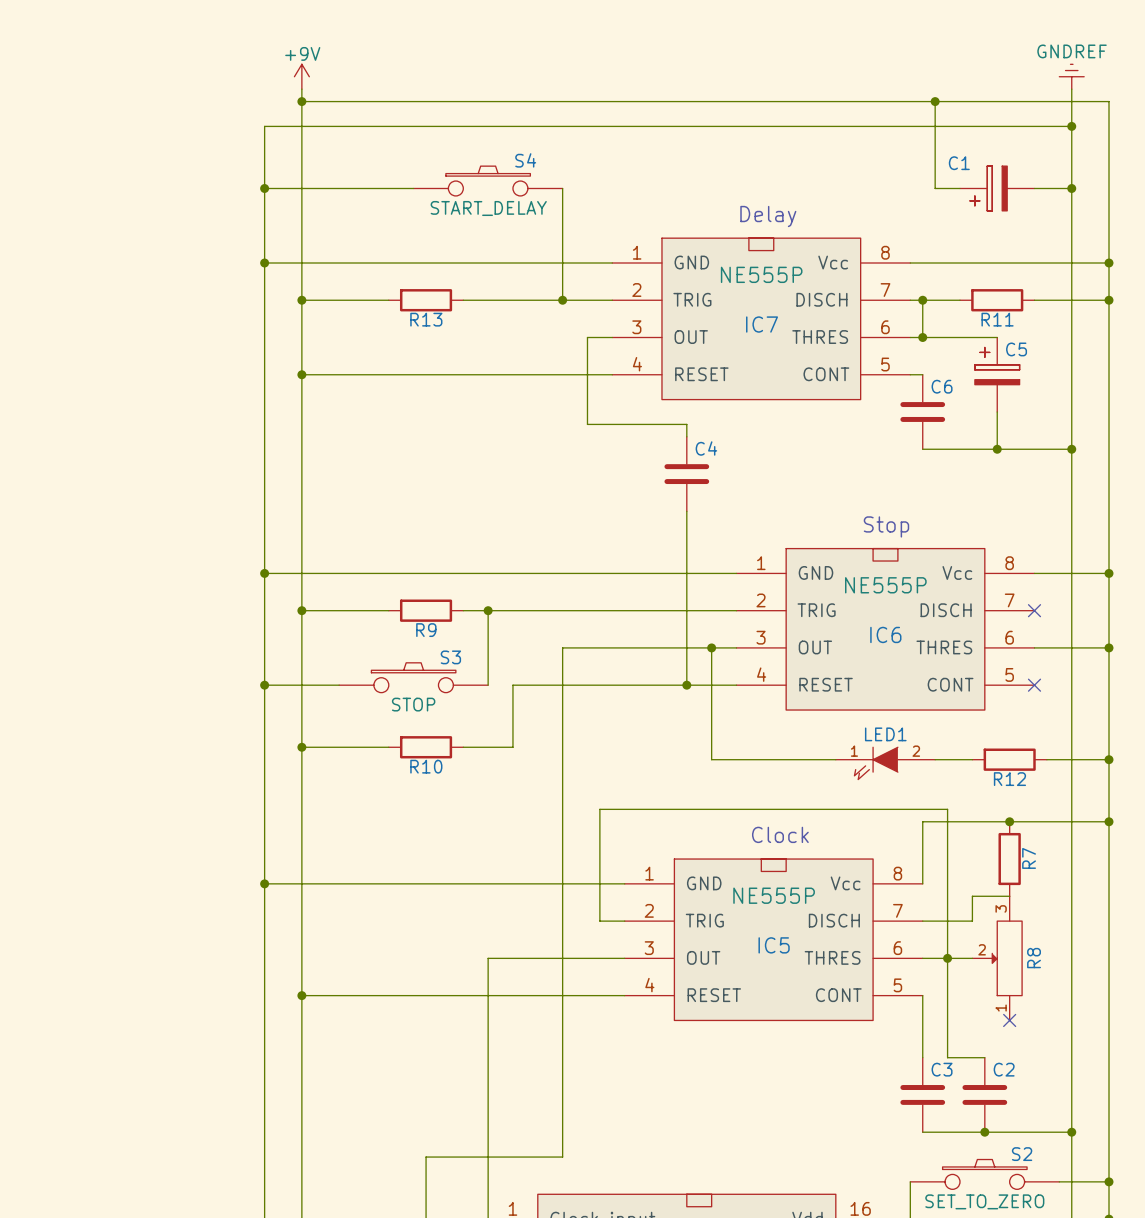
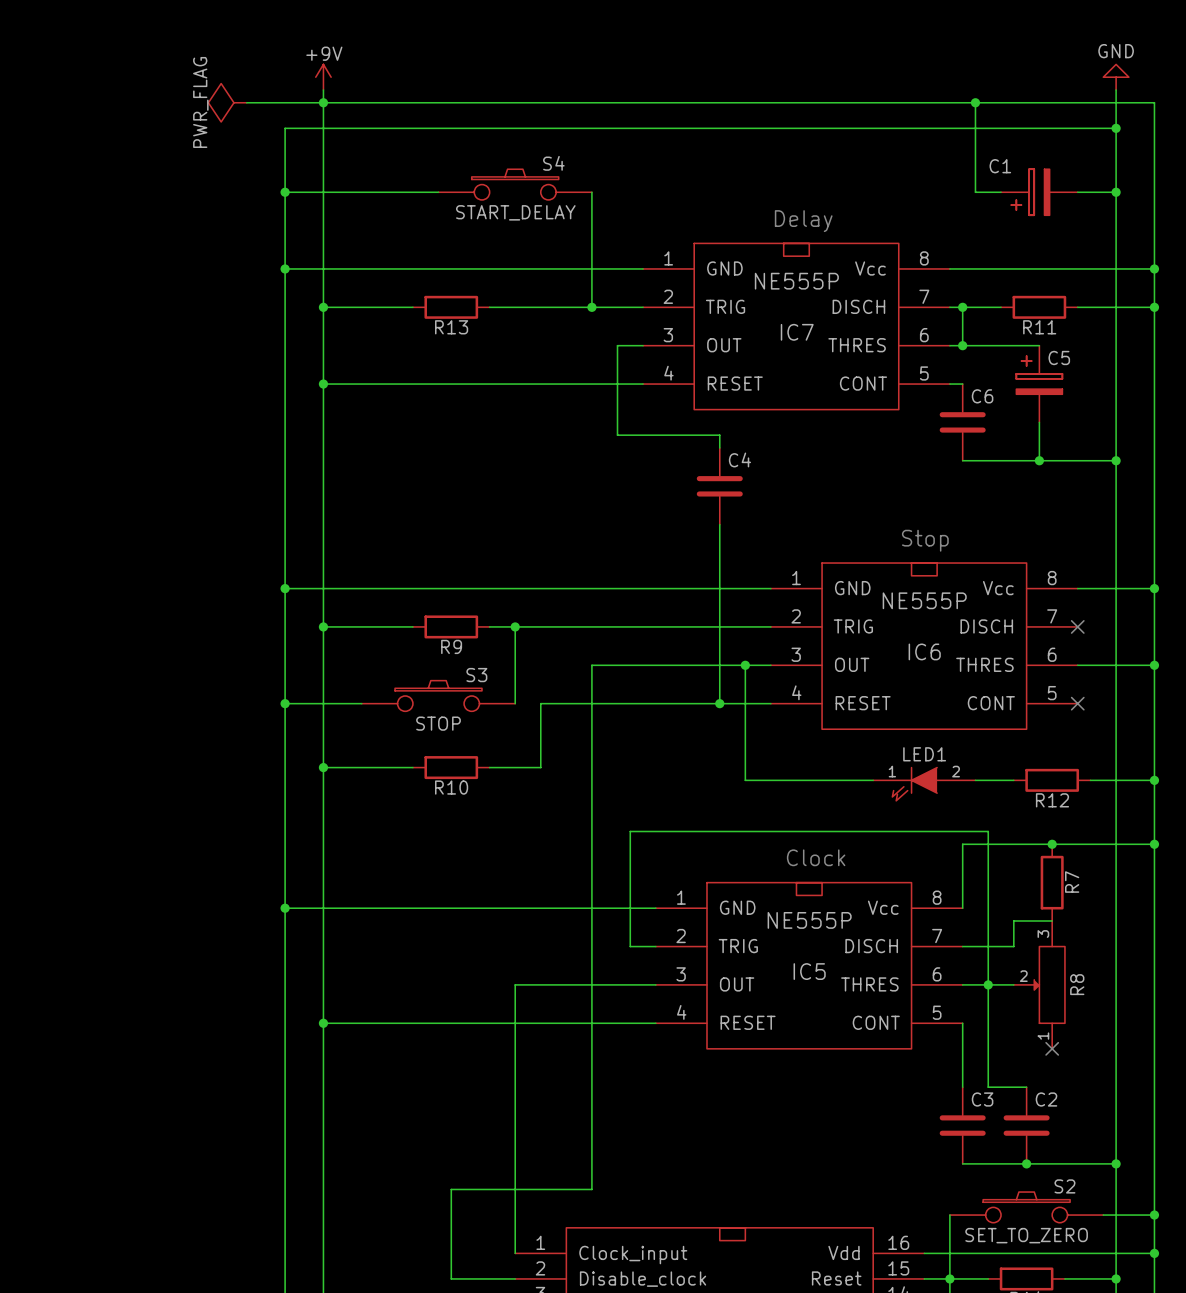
power symbol: GNDREF (1071, 76) -> GND (1116, 77)
power symbol: none -> PWR_FLAG (227, 102)
wire: none -> (246, 102) (323, 102)

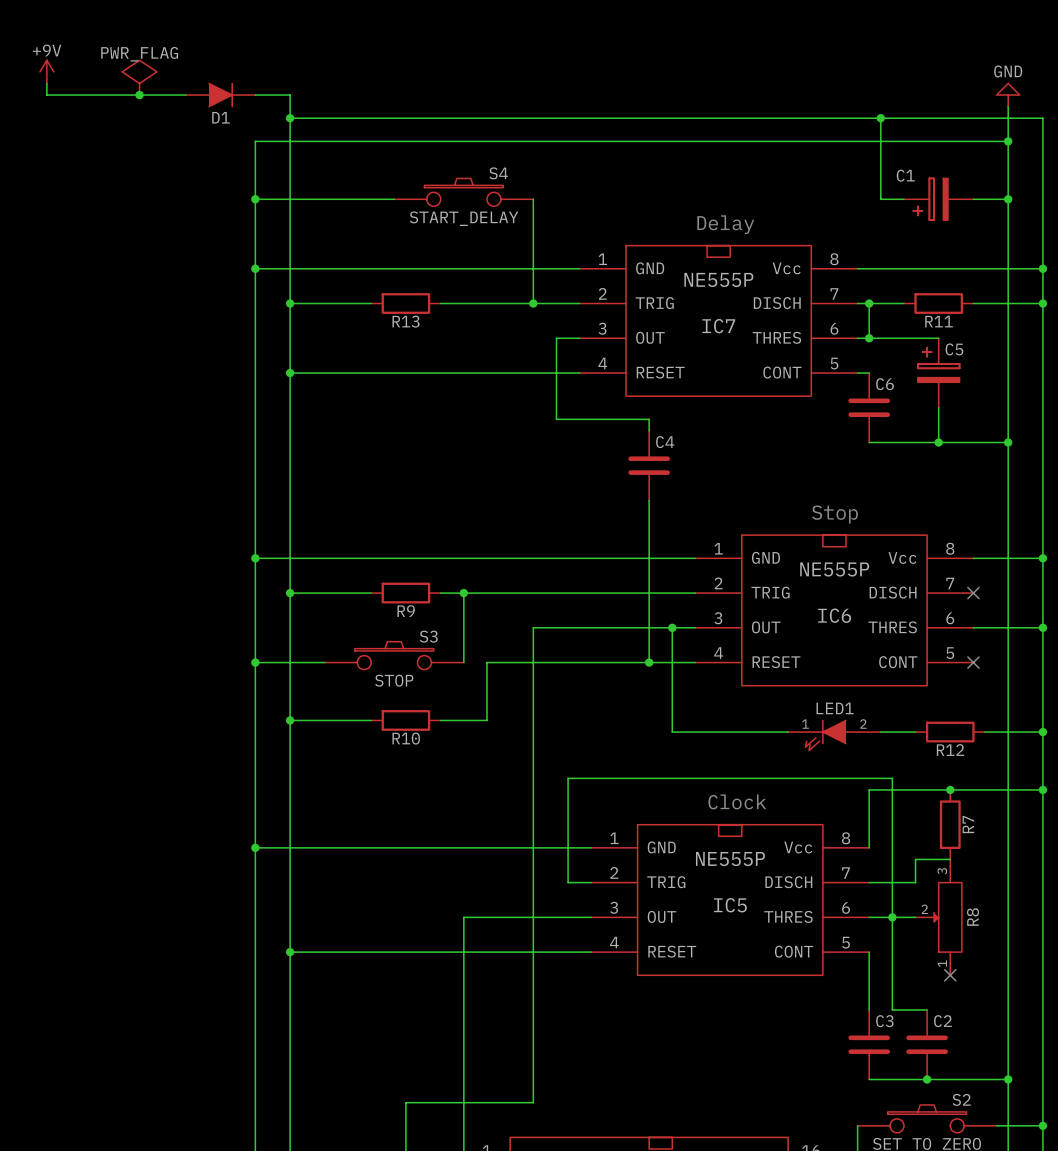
power symbol: none -> +9V (46, 71)
wire: none -> (46, 83) (46, 95) (185, 95)
junction: none -> (139, 95)
D1: none -> (220, 95)
wire: none -> (255, 95) (290, 95) (290, 106)
power symbol: +9V (323, 77) -> none
power symbol rotation: 0° (227, 102) -> 90° clockwise (139, 77)
power symbol position: PWR_FLAG (227, 102) -> PWR_FLAG (139, 77)
wire: (246, 102) (323, 102) -> none

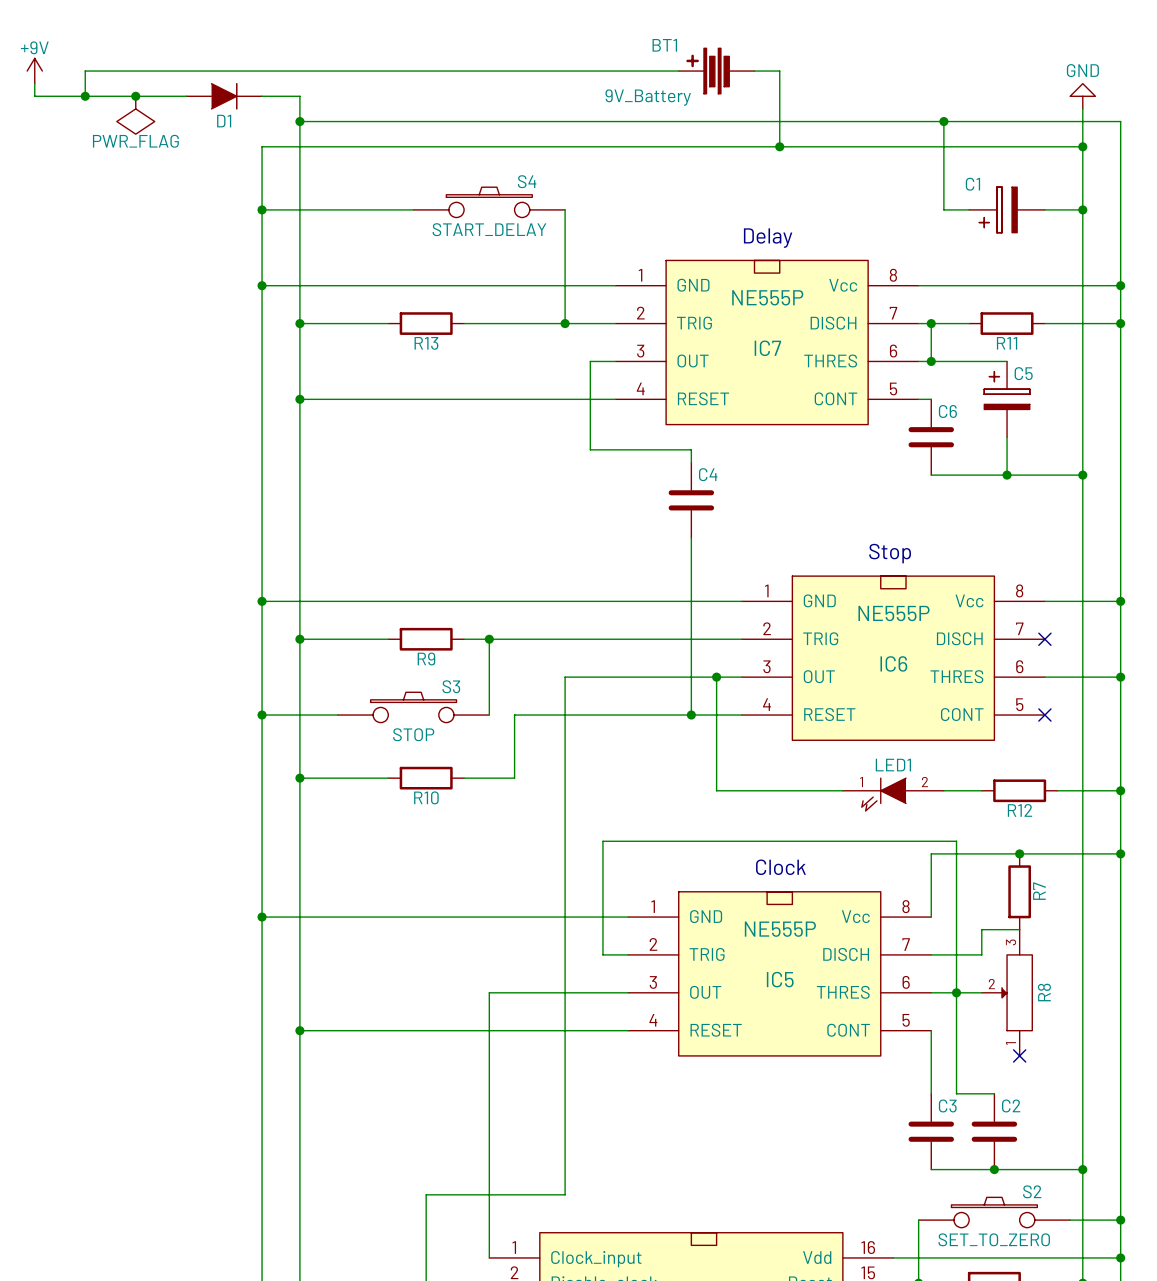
wire: none -> (678, 71) (85, 71) (85, 96)
BT1: none -> 9V_Battery (716, 71)
wire: none -> (754, 71) (779, 71) (779, 146)
power symbol rotation: 0° (139, 77) -> 180° (135, 115)
power symbol position: PWR_FLAG (139, 77) -> PWR_FLAG (135, 115)
junction: none -> (85, 96)
junction: none -> (779, 146)

